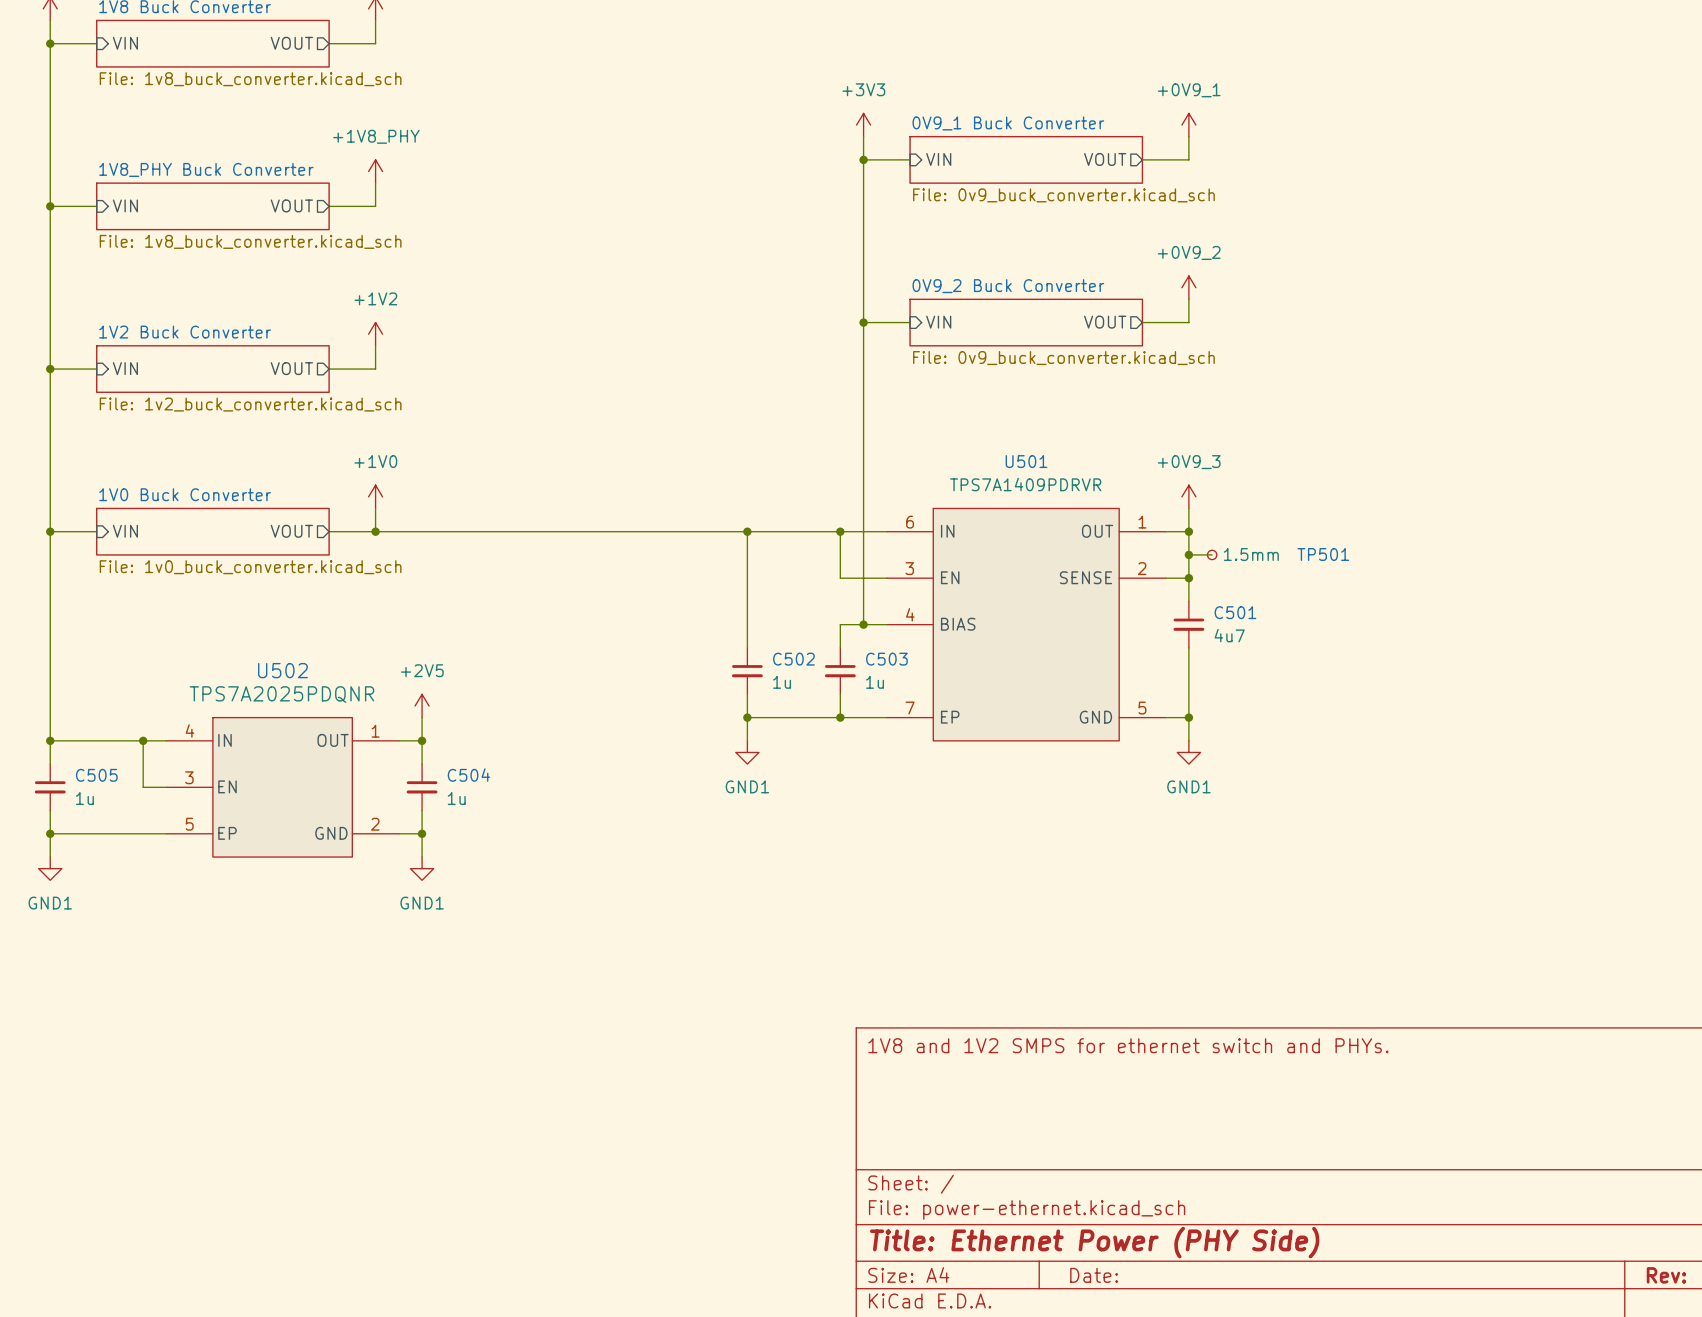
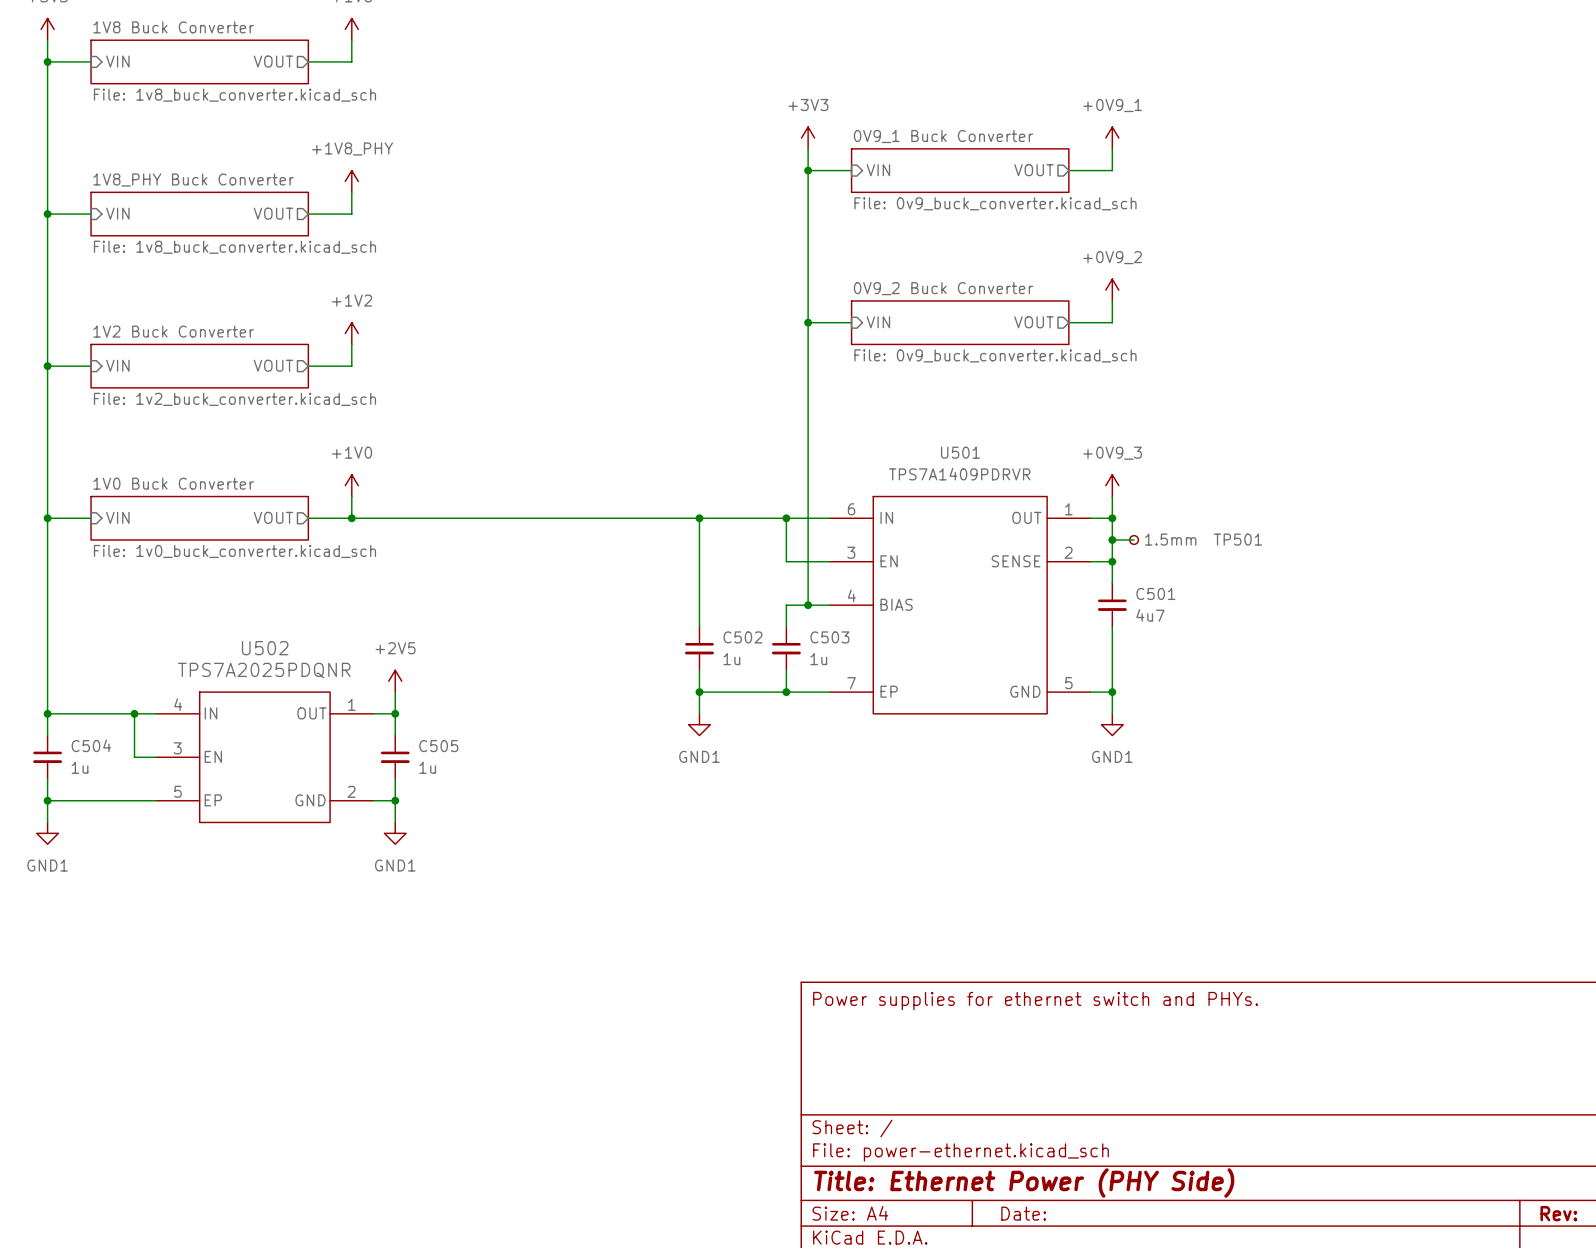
C505 name: C505 (96, 775) -> C504 (91, 745)
C504 name: C504 (468, 775) -> C505 (438, 746)
title block: 1V8 and 1V2 SMPS for ethernet switch and PHYs. (1128, 1045) -> Power supplies for ethernet switch and PHYs. (1035, 1001)

